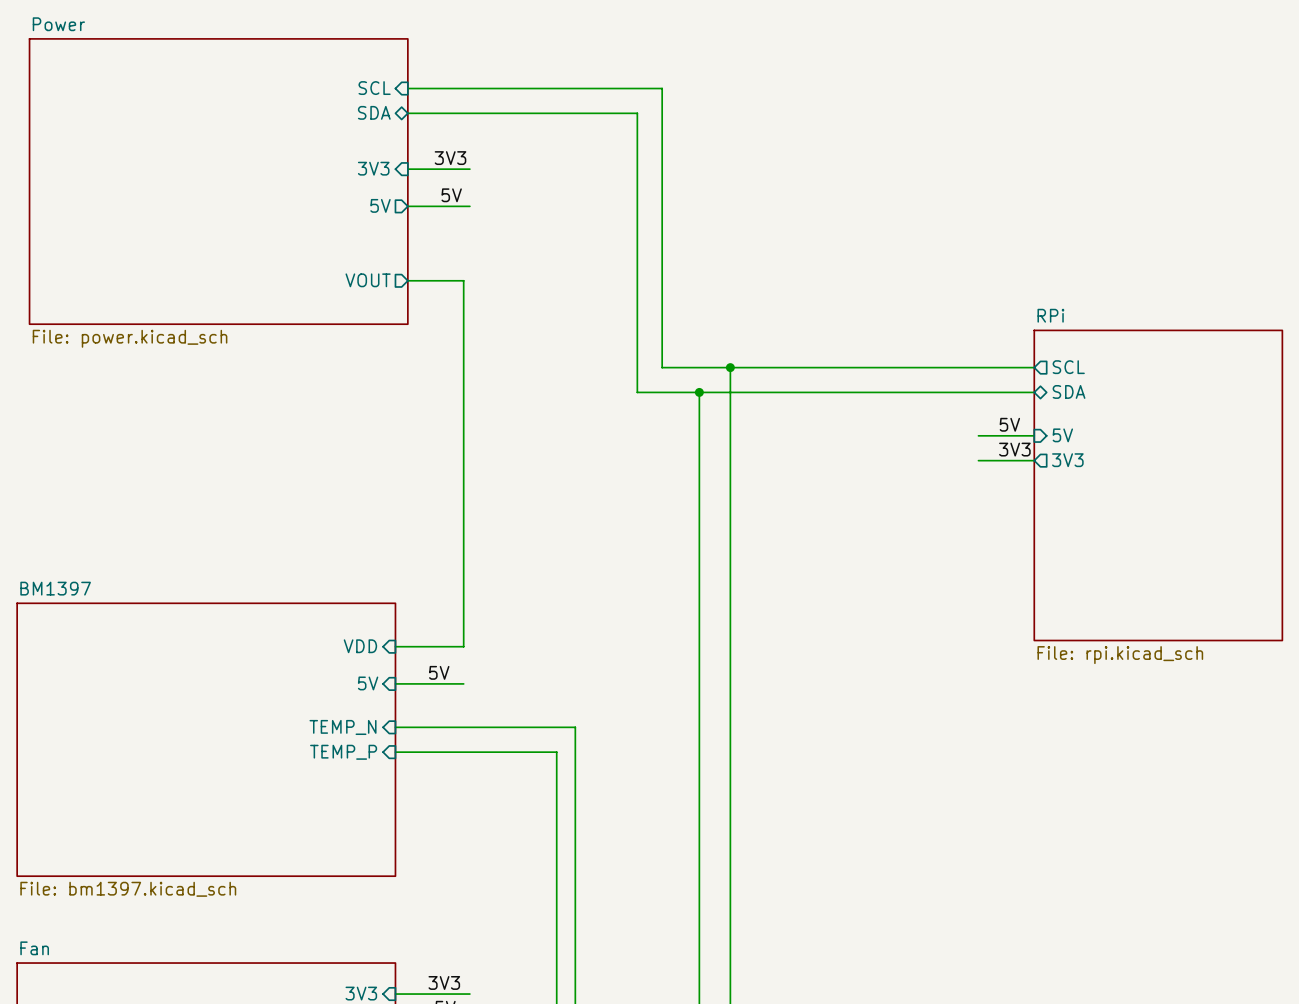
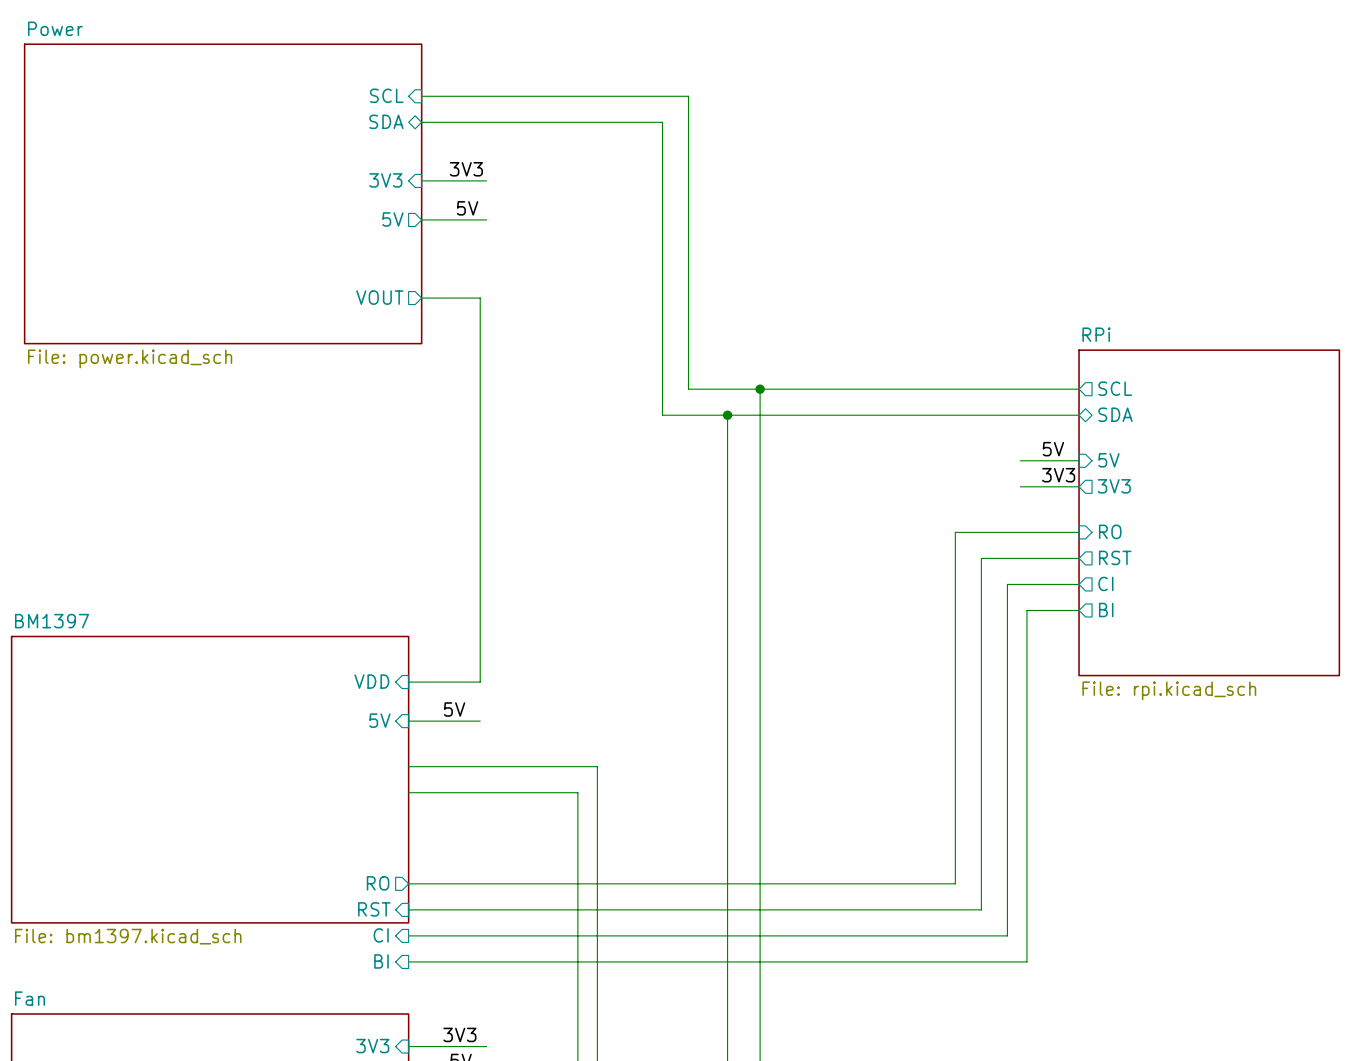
sheet pin: none -> RO (1110, 531)
wire: none -> (1079, 532) (955, 532) (955, 883) (408, 883)
wire: none -> (1079, 558) (981, 558) (981, 909) (408, 909)
sheet pin: none -> RST (1115, 557)
wire: none -> (1079, 584) (1007, 584) (1007, 935) (408, 935)
sheet pin: none -> CI (1105, 583)
wire: none -> (1079, 610) (1026, 610) (1026, 961) (408, 961)
sheet pin: none -> BI (1106, 609)
sheet pin: TEMP_N (342, 727) -> none
sheet pin: TEMP_P (343, 752) -> none
sheet pin: none -> RO (378, 883)
sheet pin: none -> RST (374, 909)
sheet pin: none -> CI (381, 935)
sheet pin: none -> BI (381, 961)

